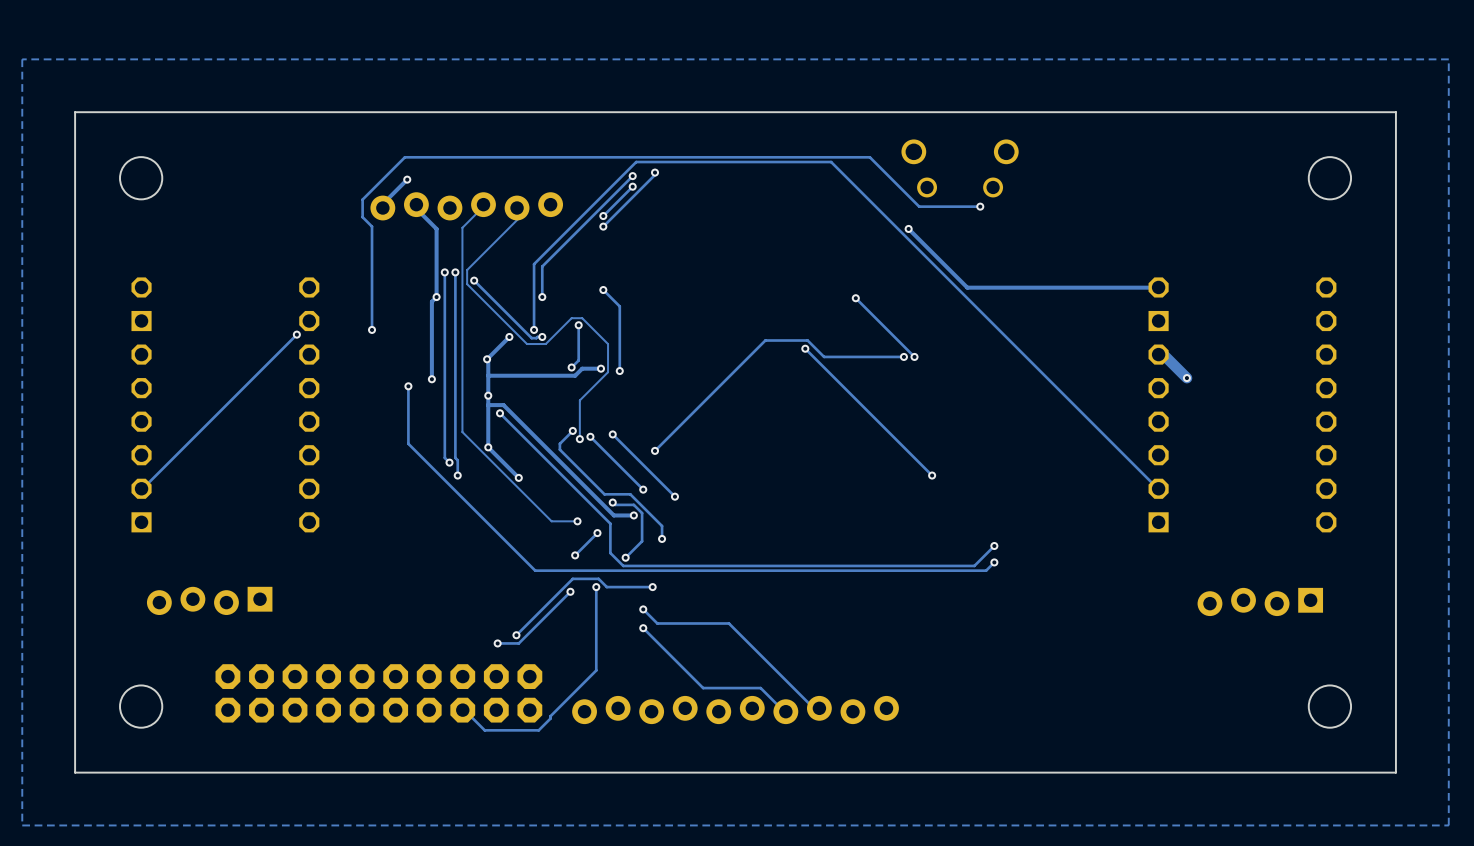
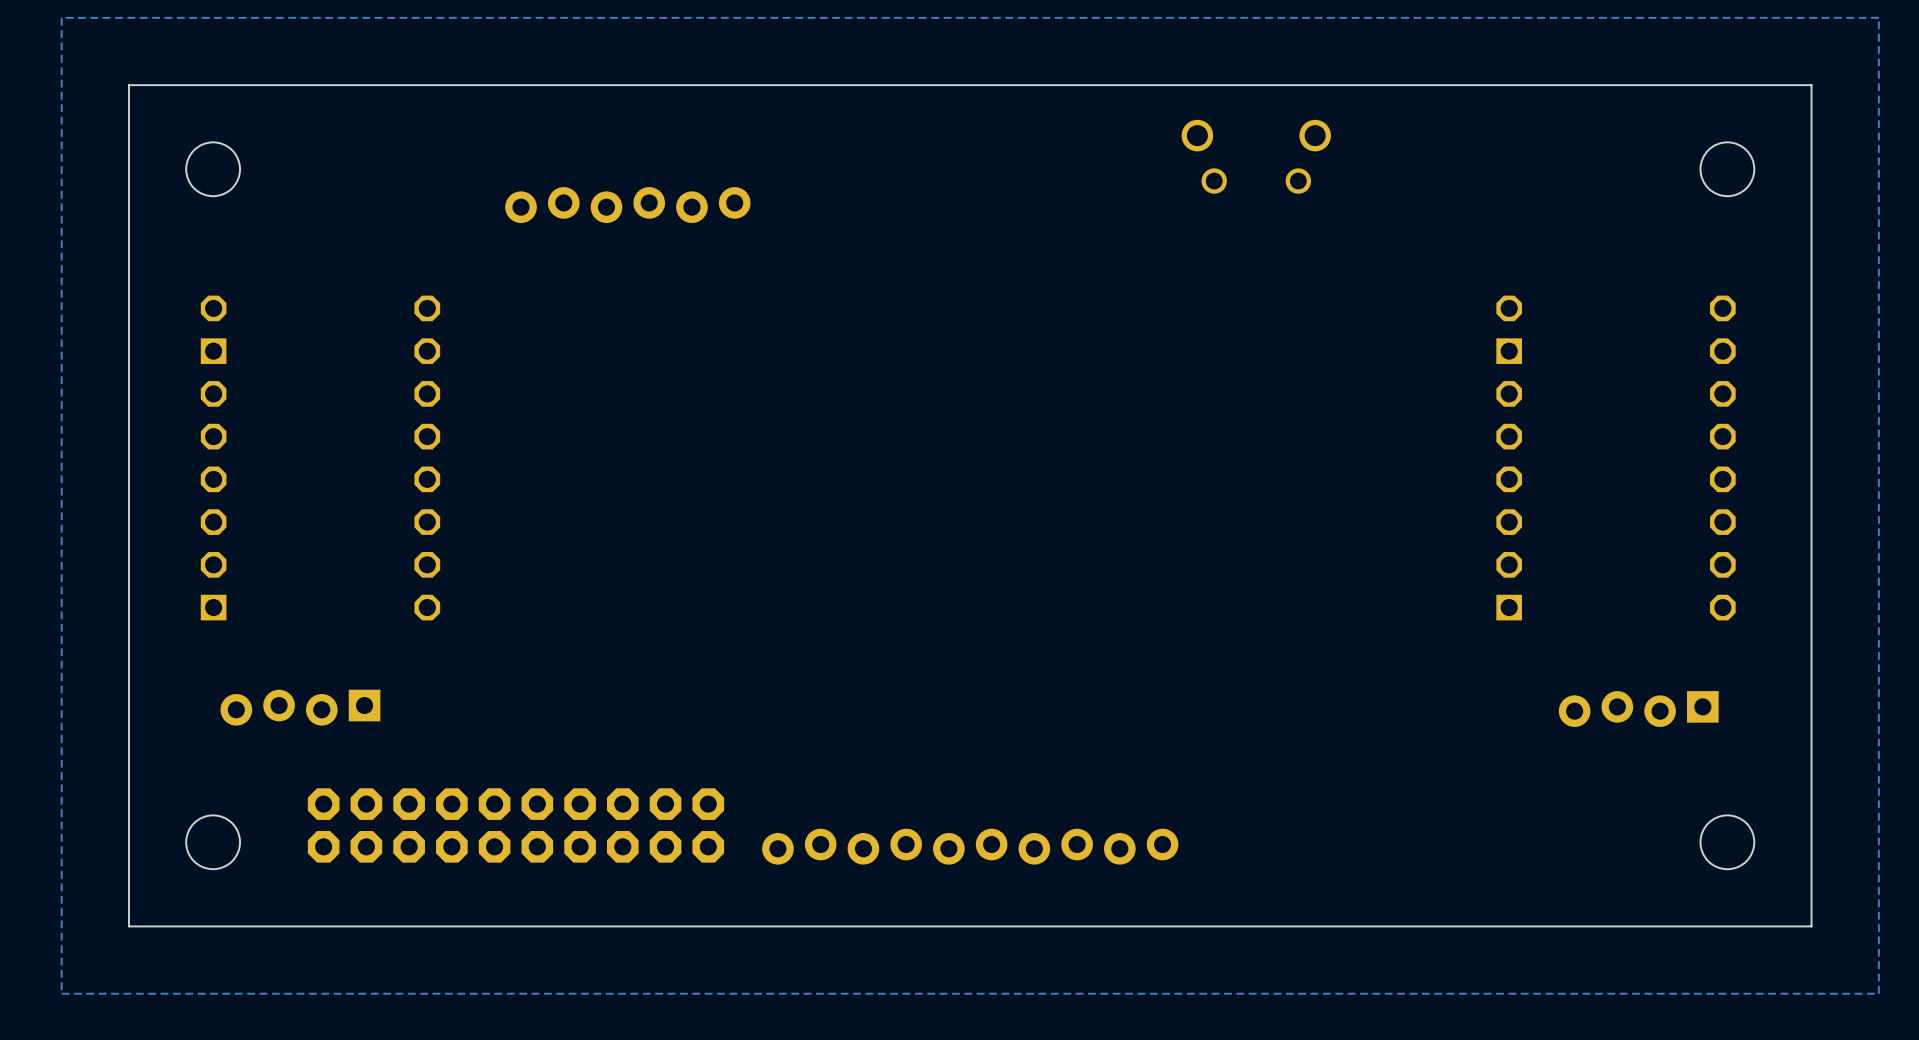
track: (655, 172) (655, 174) (603, 226) -> none
via: (655, 172) -> none
track: (632, 176) (542, 266) (542, 297) -> none
via: (632, 176) -> none
track: (407, 179) (383, 203) (382, 208) -> none
via: (407, 179) -> none
track: (632, 186) (603, 216) -> none
via: (632, 186) -> none
track: (416, 204) (416, 208) (436, 228) (436, 297) (431, 301) (431, 379) -> none
track: (483, 204) (462, 227) (462, 432) (551, 521) (577, 521) -> none
track: (980, 206) (919, 206) (869, 157) (404, 157) (362, 199) (362, 217) (372, 226) (372, 329) -> none
via: (980, 206) -> none
track: (517, 208) (517, 219) (467, 270) (467, 284) (527, 344) (545, 344) (571, 318) (582, 318) (608, 344) (608, 372) (579, 400) (579, 439) -> none
via: (603, 216) -> none
via: (603, 226) -> none
track: (908, 228) (967, 287) (1158, 287) -> none
via: (908, 228) -> none
track: (444, 272) (444, 457) (449, 462) -> none
via: (444, 272) -> none
track: (455, 272) (455, 457) (457, 460) (457, 475) -> none
via: (455, 272) -> none
track: (474, 280) (531, 338) (542, 336) -> none
via: (474, 280) -> none
track: (603, 290) (619, 306) (619, 371) -> none
via: (603, 290) -> none
via: (436, 297) -> none
via: (542, 297) -> none
track: (855, 298) (914, 356) -> none
via: (855, 298) -> none
track: (578, 325) (578, 360) (571, 367) -> none
via: (578, 325) -> none
via: (372, 329) -> none
track: (534, 329) (534, 264) (636, 162) (831, 162) (1158, 488) -> none
via: (534, 329) -> none
track: (296, 334) (141, 488) -> none
via: (296, 334) -> none
track: (509, 336) (487, 359) (488, 447) (518, 477) -> none
via: (509, 336) -> none
via: (542, 336) -> none
track: (805, 348) (932, 475) -> none
via: (805, 348) -> none
track: (1158, 354) (1163, 354) (1186, 378) -> none
track: (903, 356) (824, 356) (807, 340) (765, 340) (655, 450) -> none
via: (903, 356) -> none
via: (914, 356) -> none
via: (487, 359) -> none
via: (571, 367) -> none
track: (600, 368) (582, 368) (575, 375) (488, 375) -> none
via: (600, 368) -> none
via: (619, 371) -> none
via: (1186, 378) -> none
via: (431, 379) -> none
track: (408, 386) (408, 443) (535, 570) (986, 570) (994, 562) -> none
via: (408, 386) -> none
via: (488, 395) -> none
track: (488, 405) (503, 405) (613, 515) (633, 515) -> none
track: (500, 413) (610, 523) (610, 553) (623, 565) (974, 565) (994, 545) -> none
via: (500, 413) -> none
track: (572, 430) (559, 443) (559, 449) (604, 494) (630, 494) (662, 526) (662, 538) -> none
via: (572, 430) -> none
track: (612, 434) (674, 496) -> none
via: (612, 434) -> none
track: (590, 436) (643, 489) -> none
via: (590, 436) -> none
via: (579, 439) -> none
via: (488, 447) -> none
via: (655, 450) -> none
via: (449, 462) -> none
via: (457, 475) -> none
via: (932, 475) -> none
via: (518, 477) -> none
via: (643, 489) -> none
via: (674, 496) -> none
track: (612, 502) (615, 504) (633, 504) (642, 513) (642, 541) (625, 557) -> none
via: (612, 502) -> none
via: (633, 515) -> none
via: (577, 521) -> none
track: (597, 533) (575, 555) -> none
via: (597, 533) -> none
via: (662, 538) -> none
via: (994, 545) -> none
via: (575, 555) -> none
via: (625, 557) -> none
via: (994, 562) -> none
track: (596, 587) (596, 670) (538, 730) (484, 730) (462, 710) -> none
via: (596, 587) -> none
track: (652, 587) (606, 587) (598, 578) (572, 578) (516, 635) -> none
via: (652, 587) -> none
track: (570, 591) (518, 643) (497, 643) -> none
via: (570, 591) -> none
track: (643, 609) (657, 623) (728, 623) (813, 708) (819, 708) -> none
via: (643, 609) -> none
track: (643, 628) (703, 688) (760, 688) (785, 711) -> none
via: (643, 628) -> none
via: (516, 635) -> none
via: (497, 643) -> none

